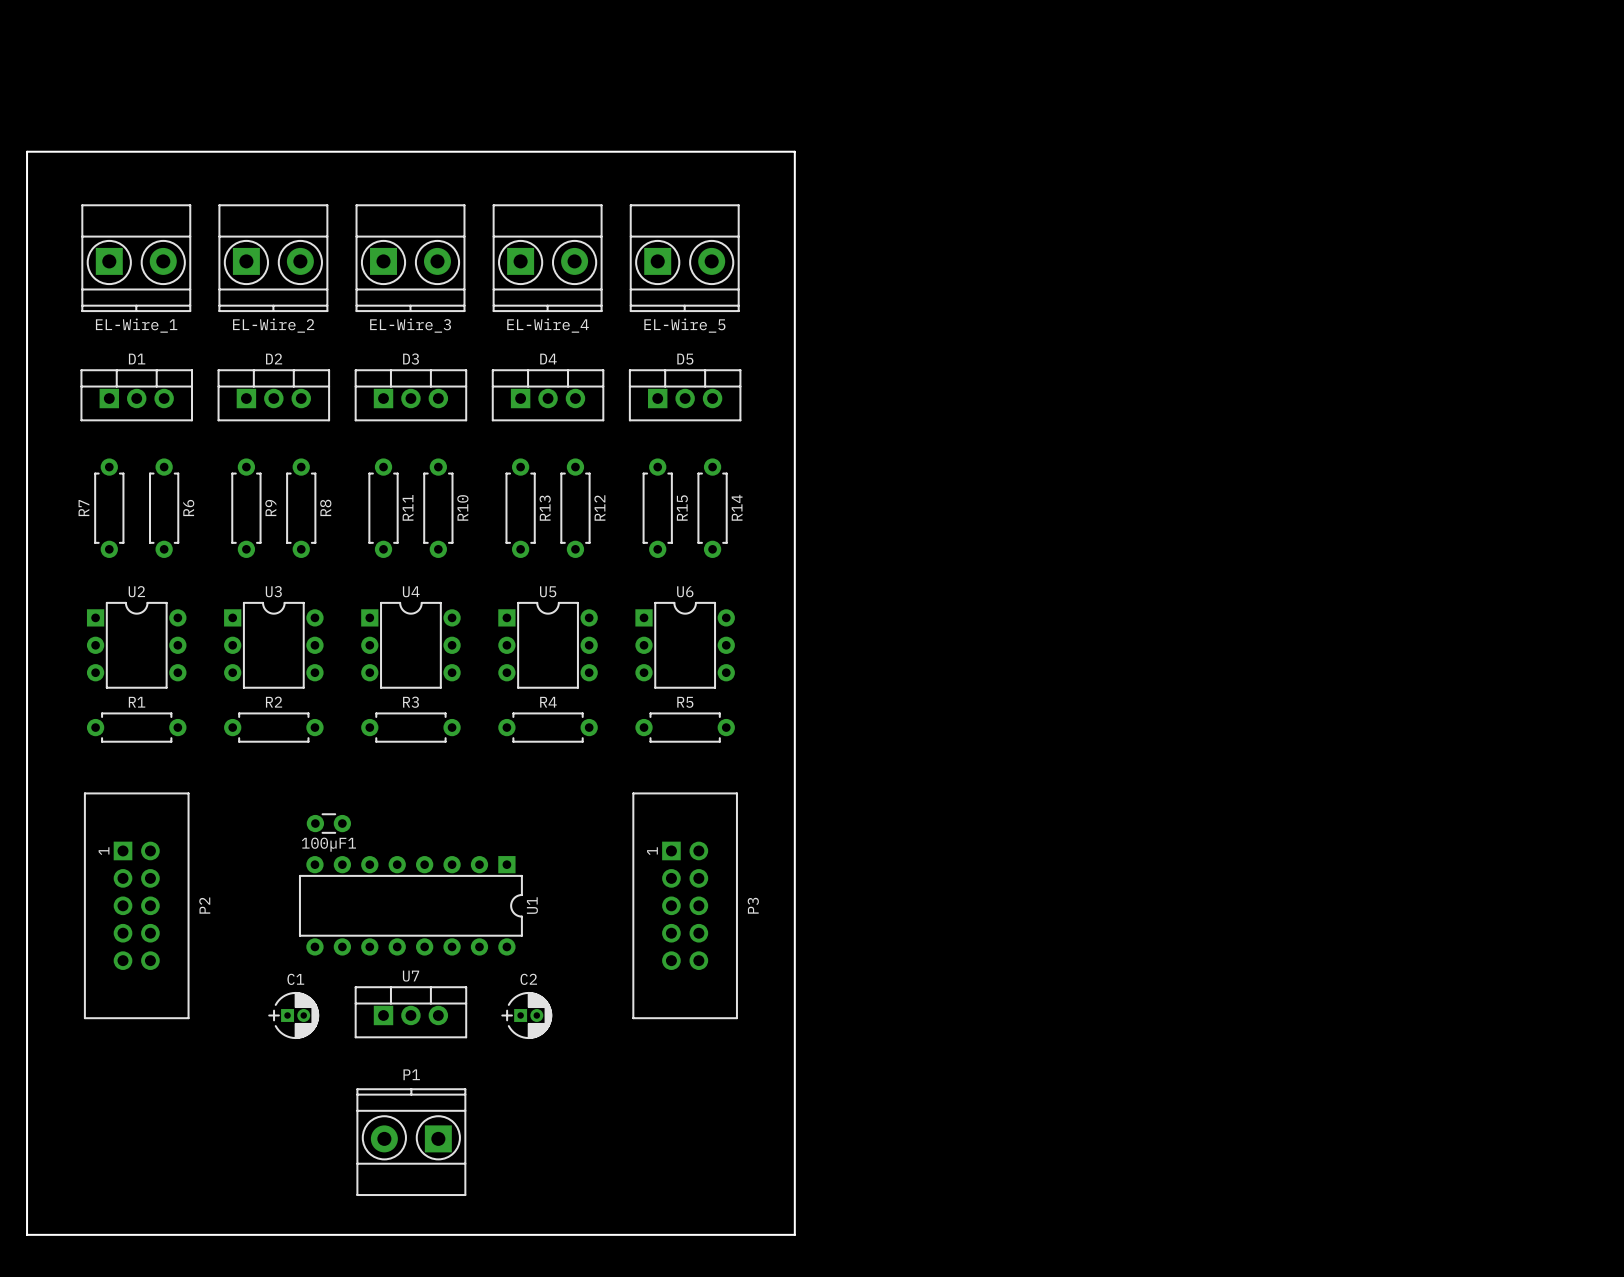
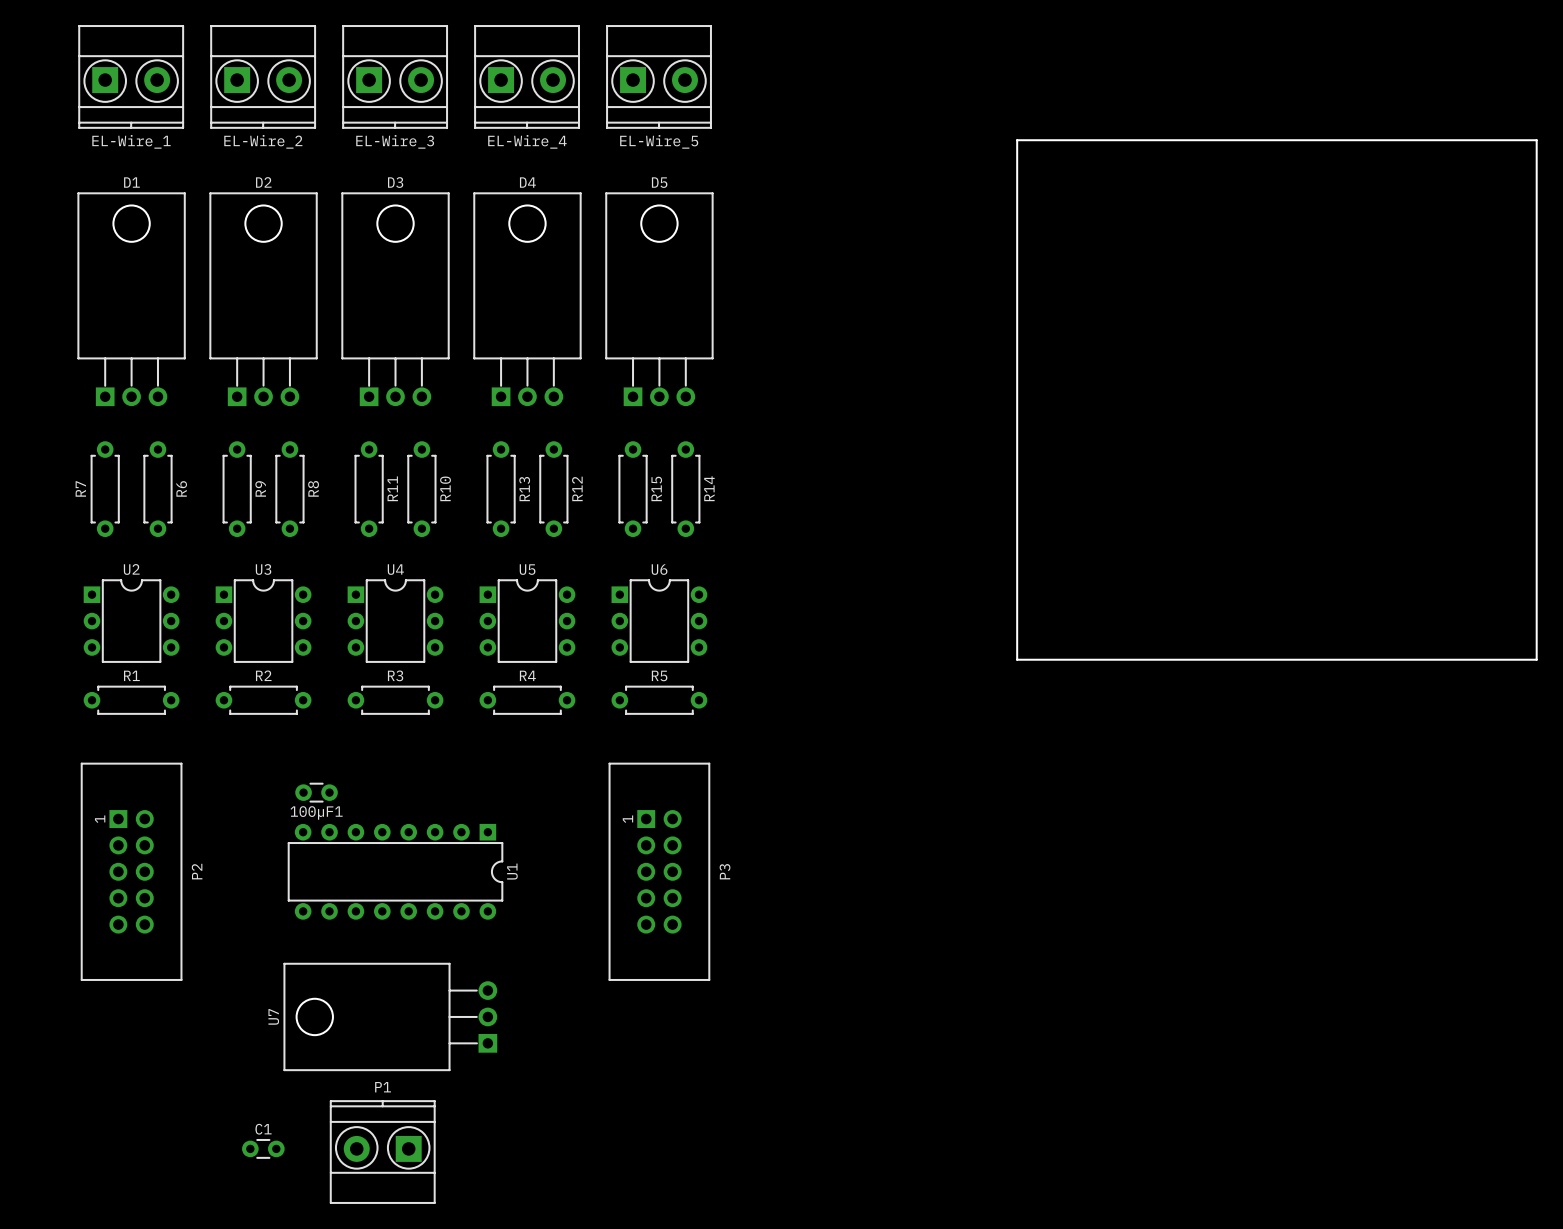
board edge: none -> (1017, 140) (1017, 659) (1536, 659) (1536, 140) (1017, 140)
board edge: (27, 151) (27, 1234) (794, 1234) (794, 151) (27, 151) -> none
EL-Wire_1 position: (136, 258) -> (131, 76)
EL-Wire_2 position: (273, 258) -> (263, 76)
EL-Wire_3 position: (410, 258) -> (395, 76)
EL-Wire_4 position: (547, 258) -> (527, 76)
EL-Wire_5 position: (684, 258) -> (659, 76)
D2 name position: D2 (274, 358) -> D2 (263, 182)
D1 name position: D1 (137, 359) -> D1 (131, 182)
D3 name position: D3 (411, 359) -> D3 (395, 182)
D4 name position: D4 (548, 359) -> D4 (527, 182)
D5 name position: D5 (685, 359) -> D5 (659, 182)
D1 footprint: [80, 369, 193, 421] -> [77, 192, 186, 407]
D2 footprint: [217, 369, 330, 421] -> [209, 192, 318, 407]
D3 footprint: [355, 369, 467, 421] -> [341, 192, 450, 407]
D4 footprint: [492, 369, 604, 421] -> [473, 192, 582, 407]
D5 footprint: [629, 369, 742, 421] -> [605, 192, 714, 407]
U7 name position: U7 (411, 976) -> U7 (273, 1016)
U7 footprint: [355, 986, 467, 1038] -> [283, 963, 498, 1071]
C1 footprint: [268, 992, 319, 1039] -> [242, 1139, 285, 1159]
C2: (526, 1015) -> none
P1 position: (411, 1142) -> (382, 1152)

